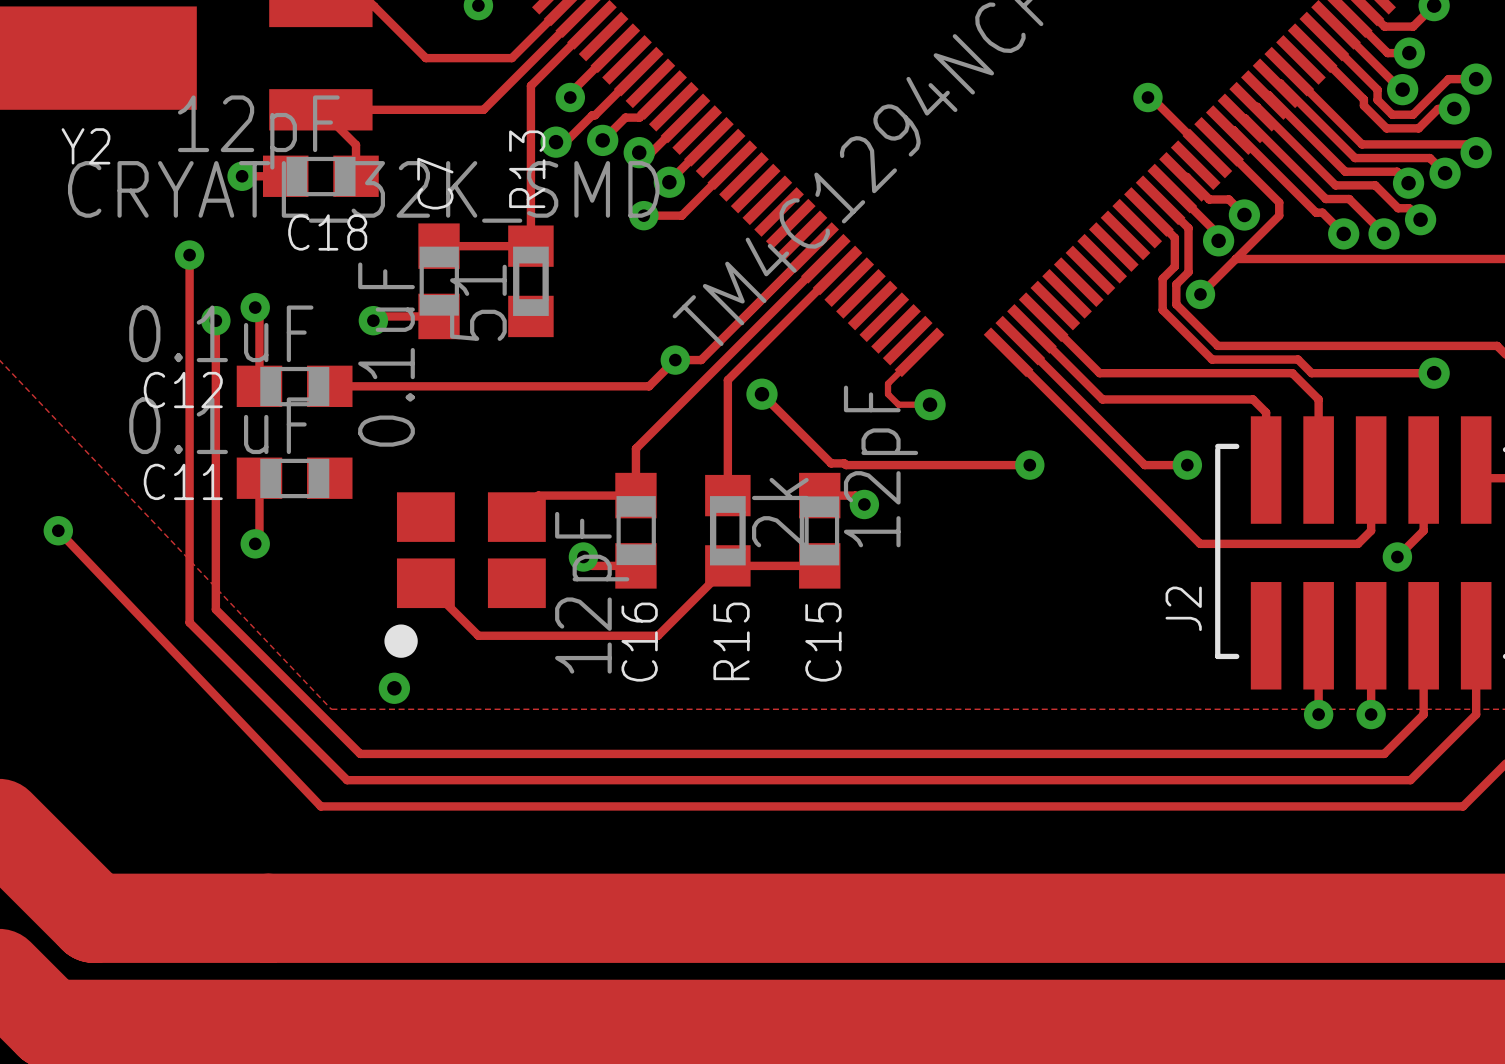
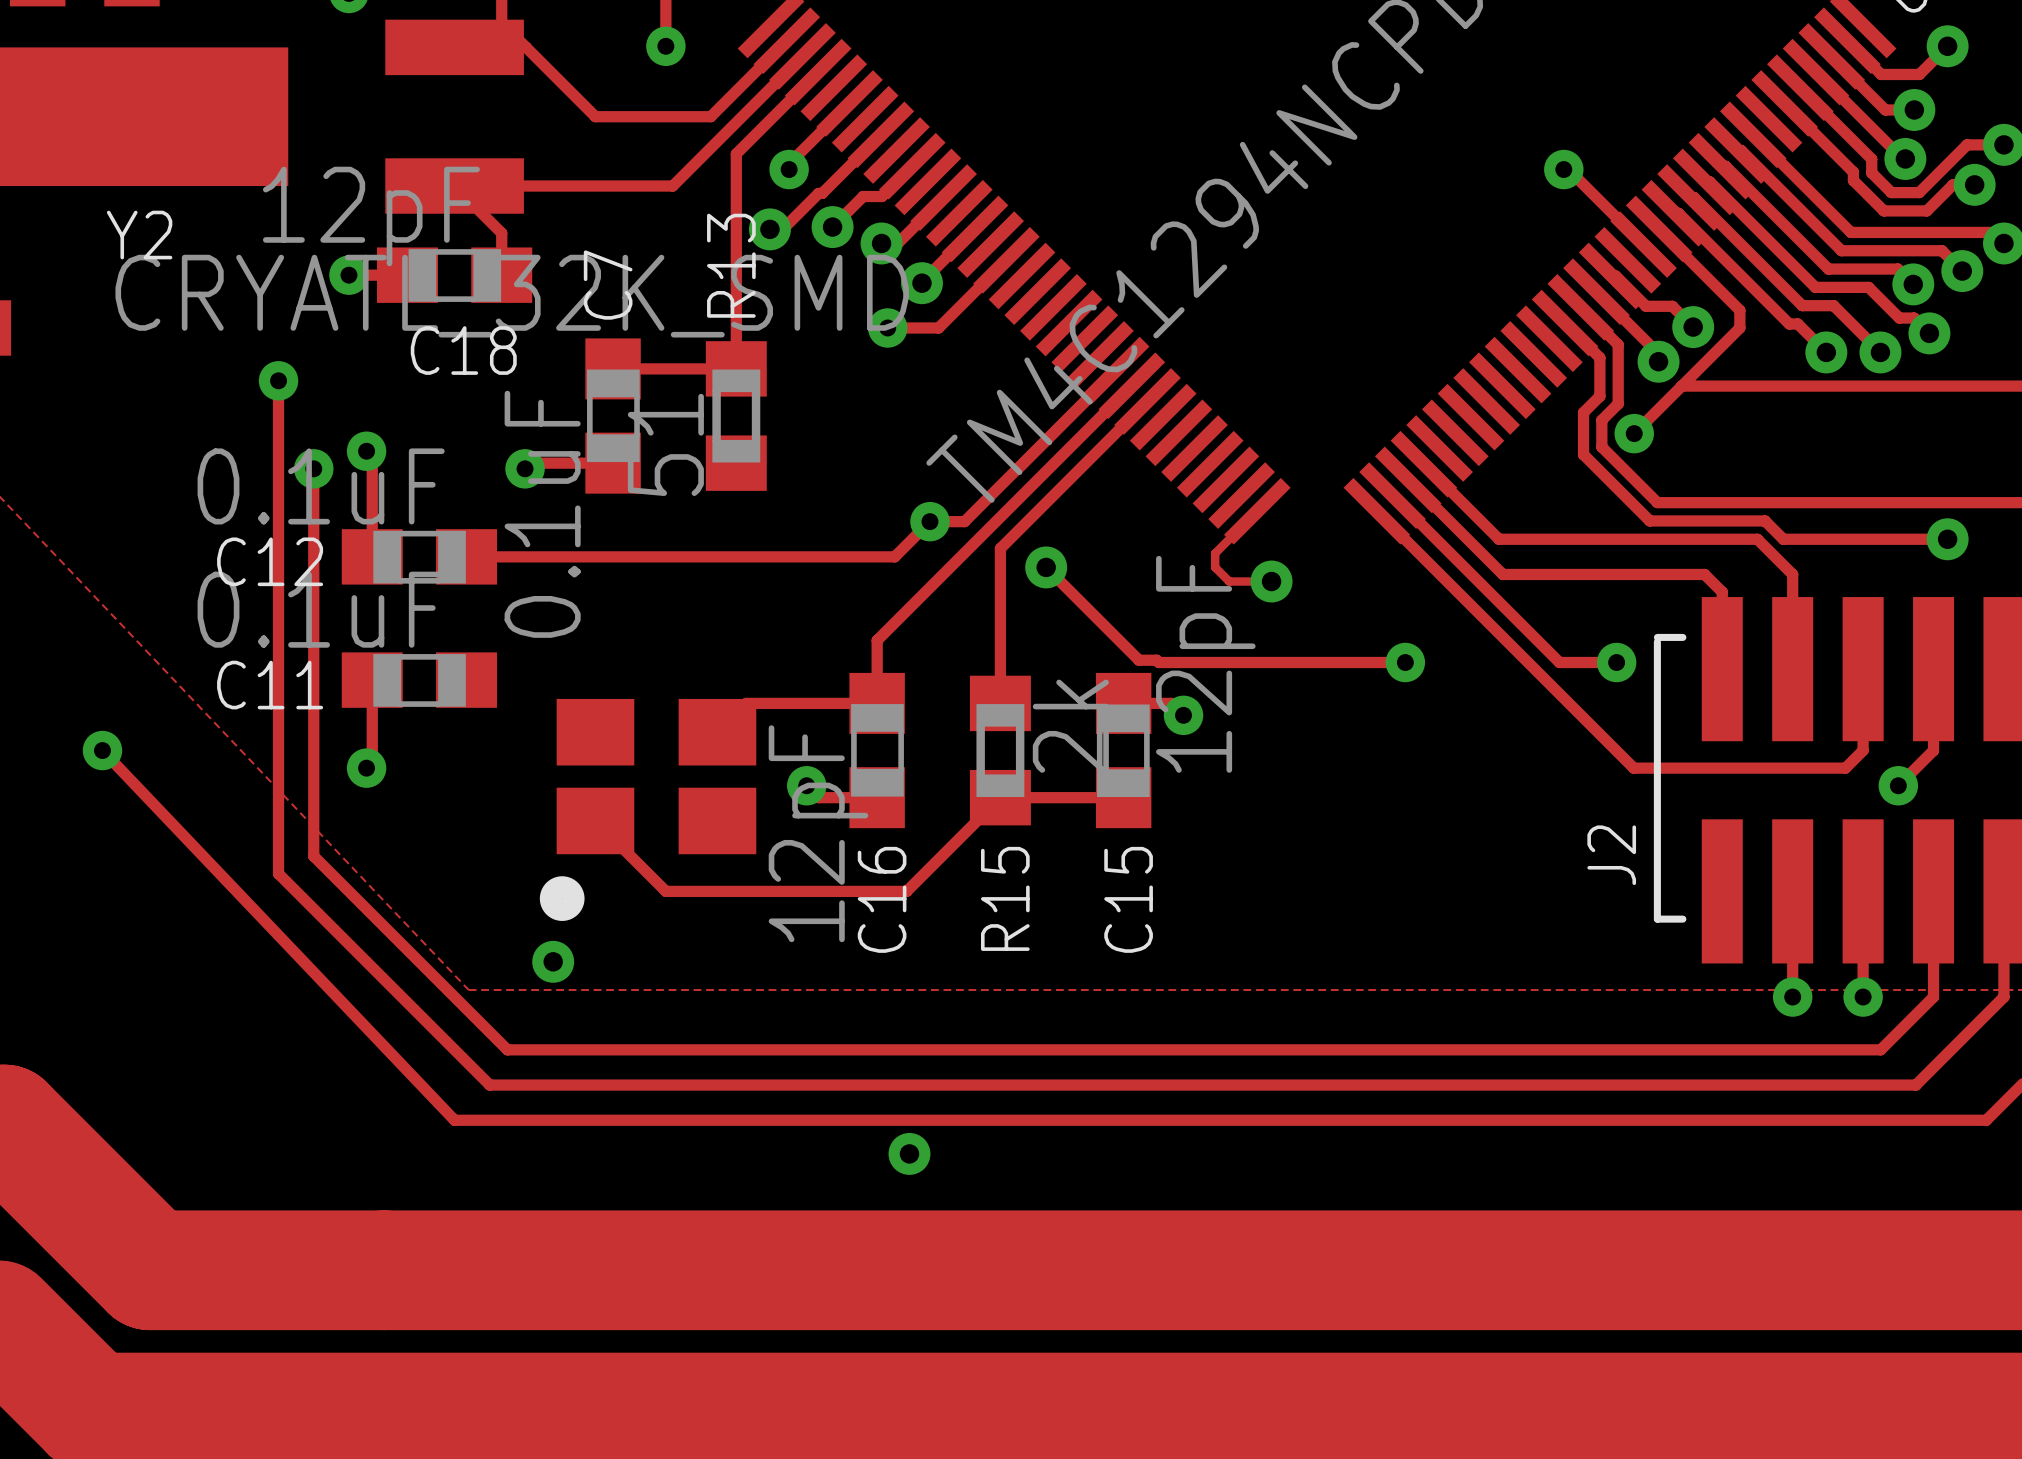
via: none -> (909, 1153)

